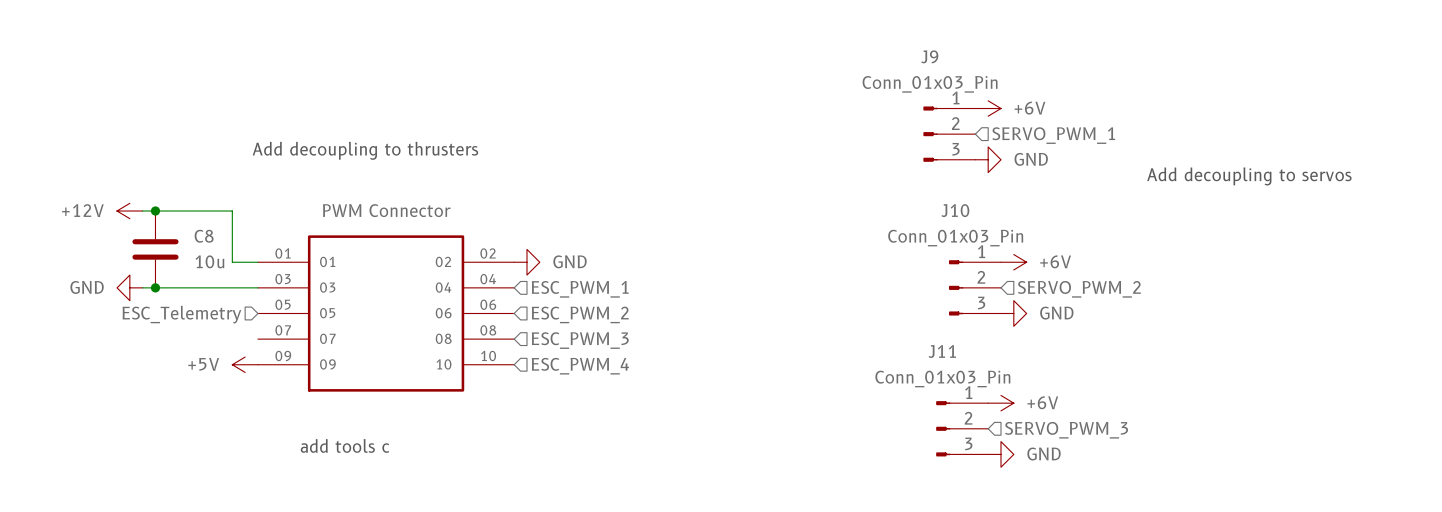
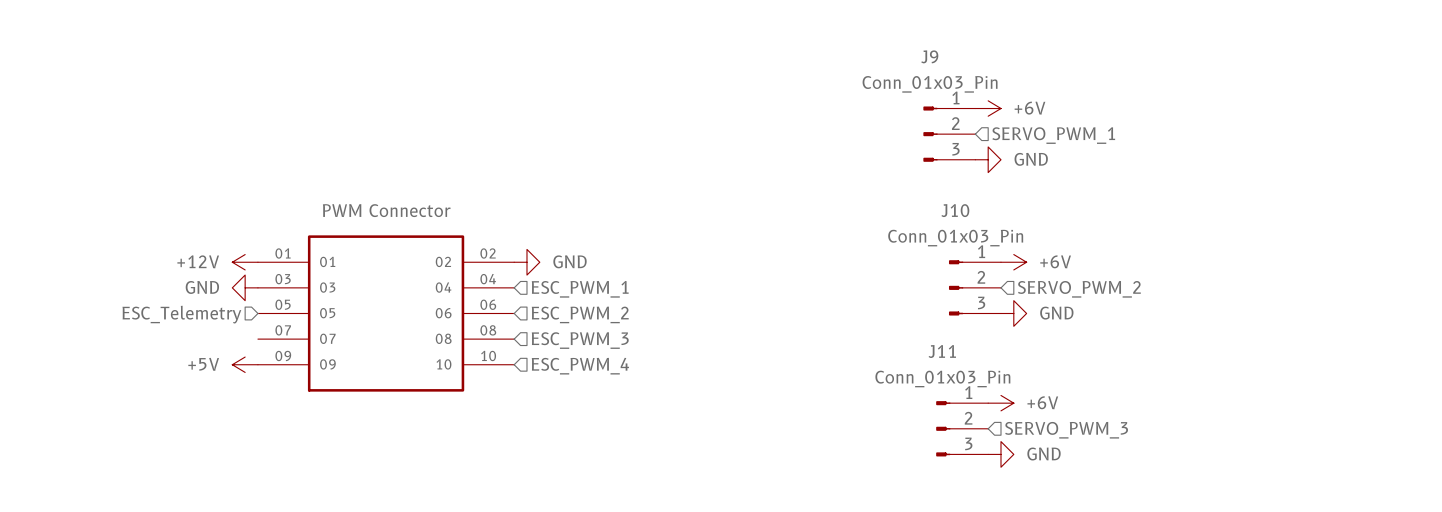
text: Add decoupling to thrusters (365, 150) -> none
text: Add decoupling to servos (1249, 176) -> none
power symbol position: +12V (129, 211) -> +12V (245, 262)
wire: (142, 211) (232, 211) (232, 262) (257, 262) -> none
junction: (155, 211) -> none
C8: 10u (155, 249) -> none
power symbol position: GND (129, 287) -> GND (245, 287)
wire: (142, 287) (257, 287) -> none
junction: (155, 287) -> none
text: add tools c (344, 445) -> none

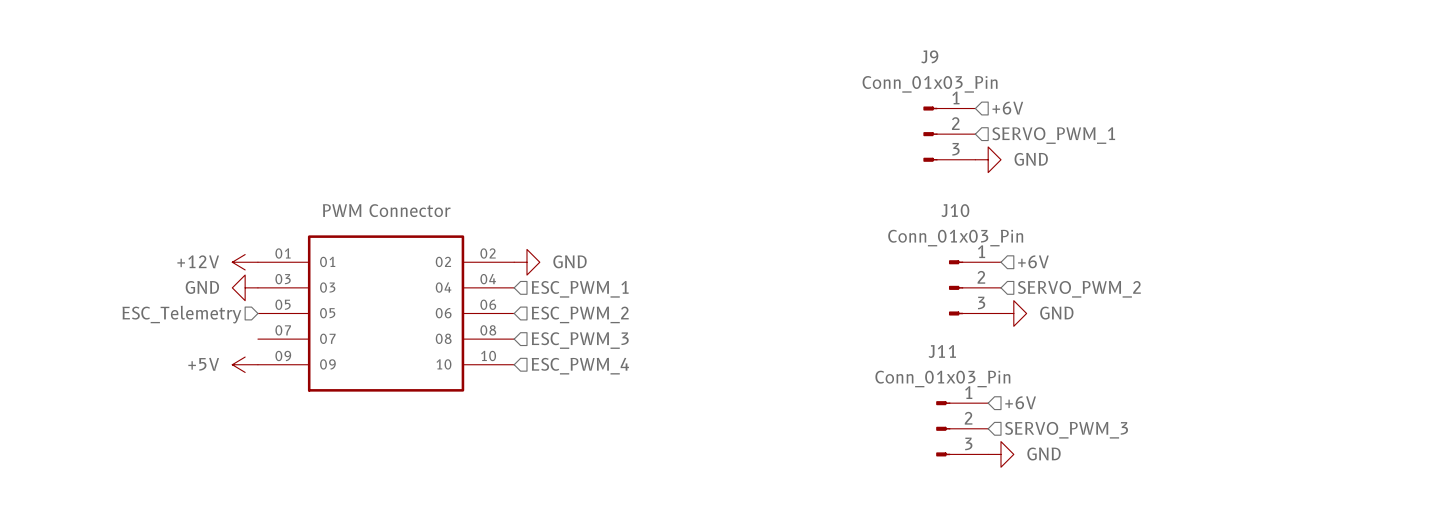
power symbol: +6V (988, 108) -> none
hierarchical label: none -> +6V (1007, 108)
hierarchical label: none -> +6V (1033, 261)
power symbol: +6V (1013, 262) -> none
hierarchical label: none -> +6V (1020, 402)
power symbol: +6V (1000, 403) -> none

